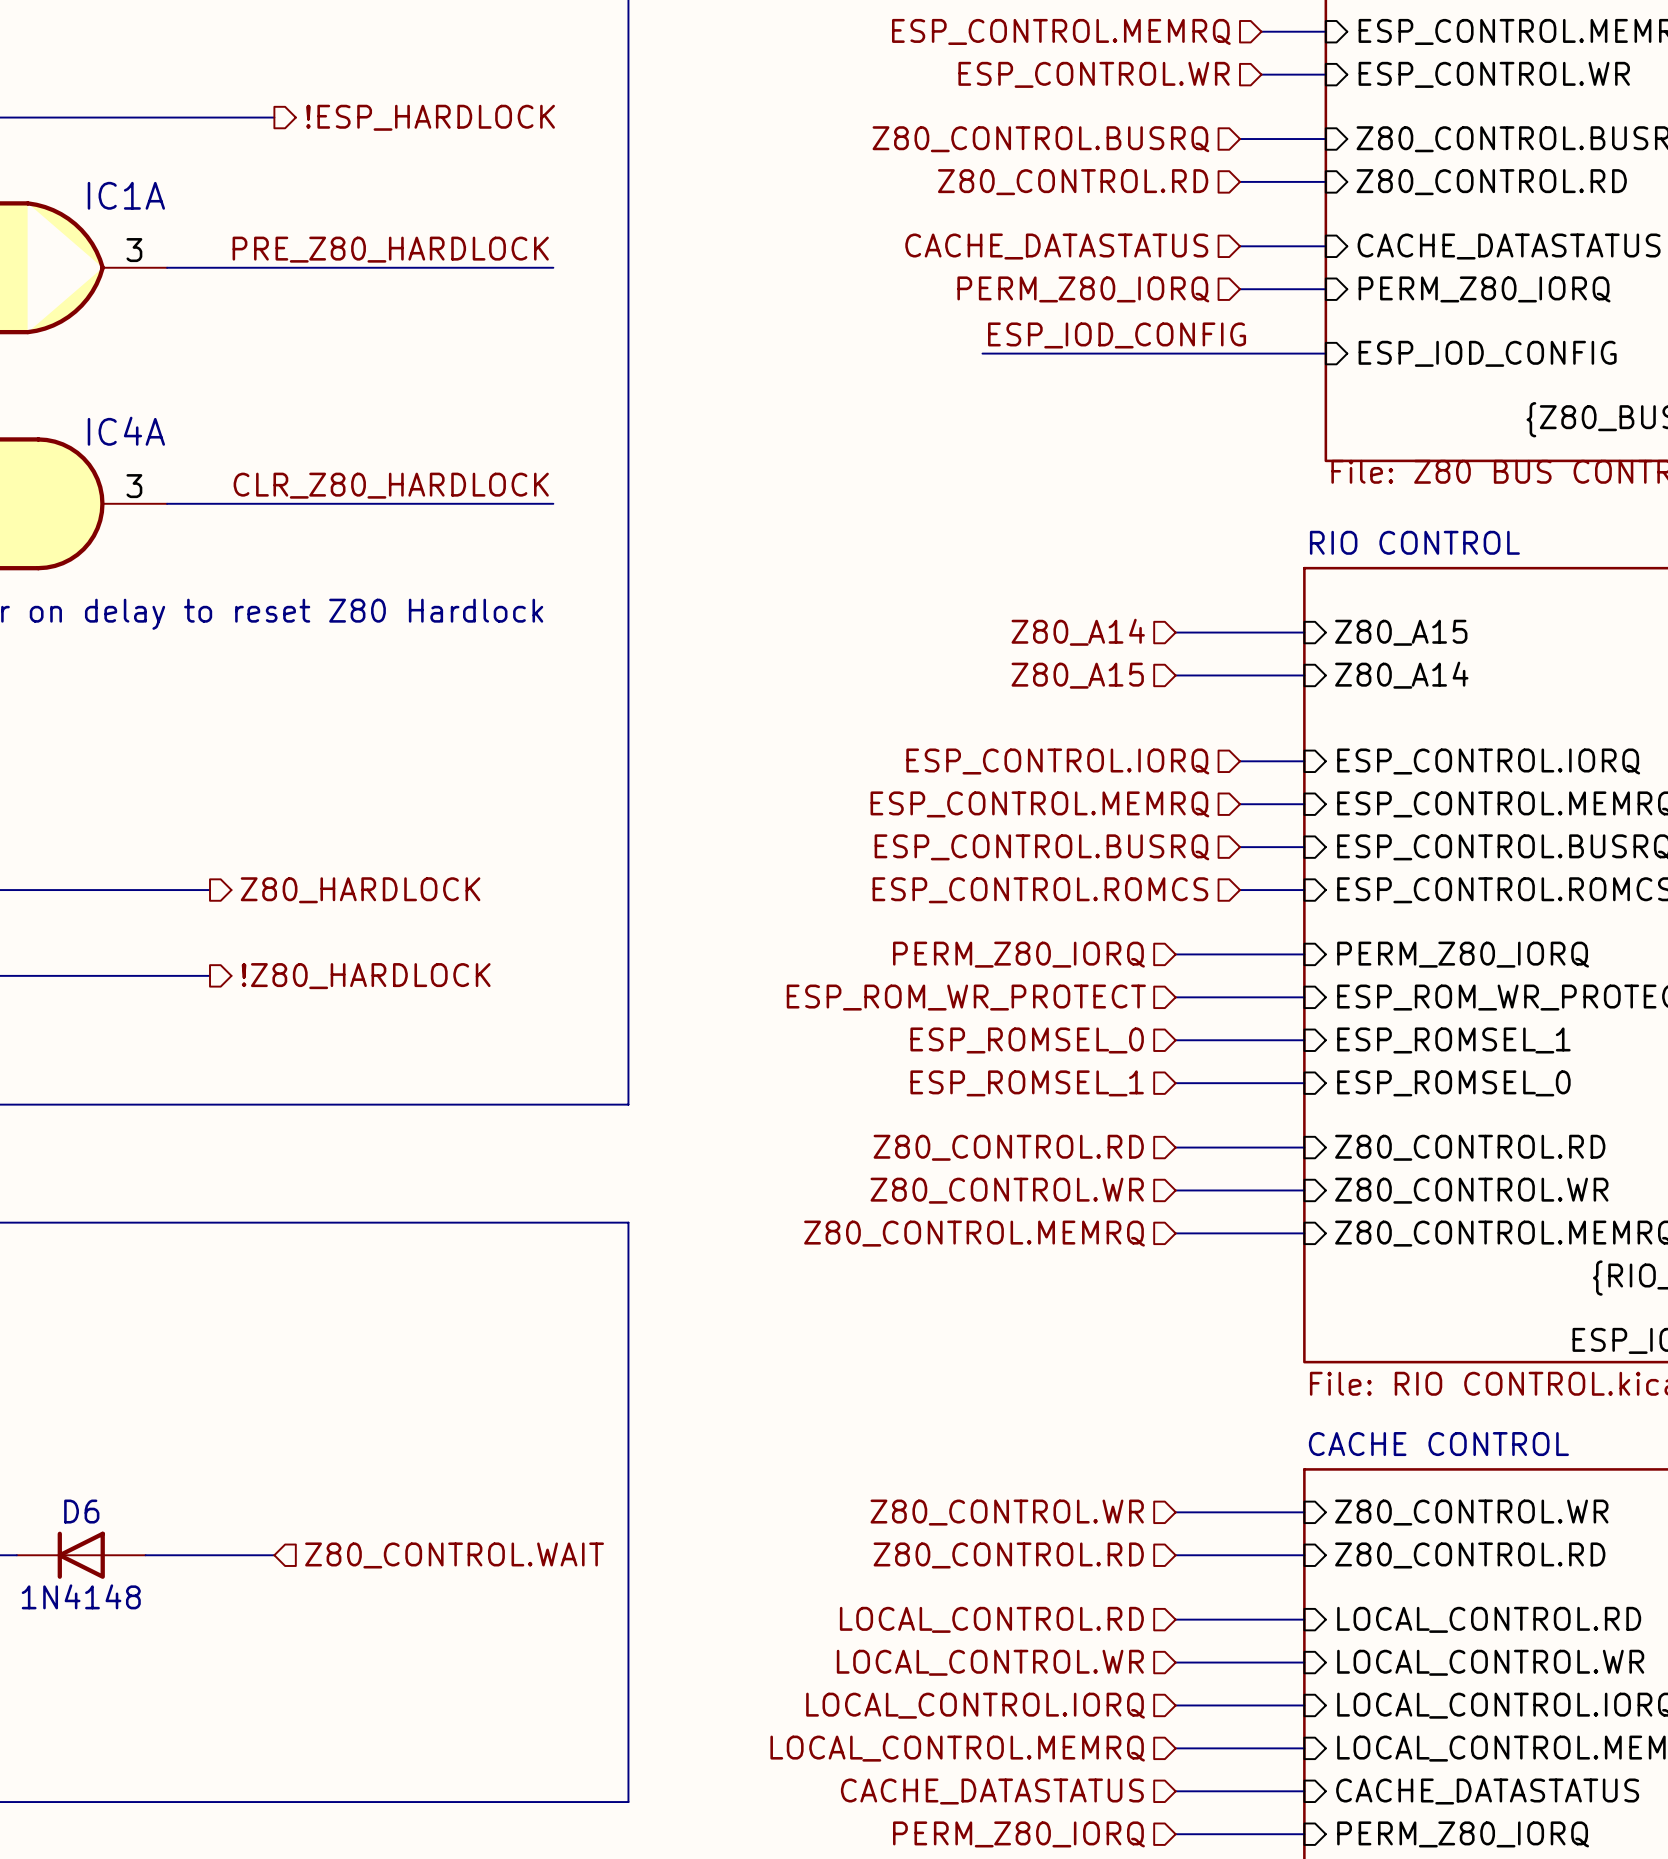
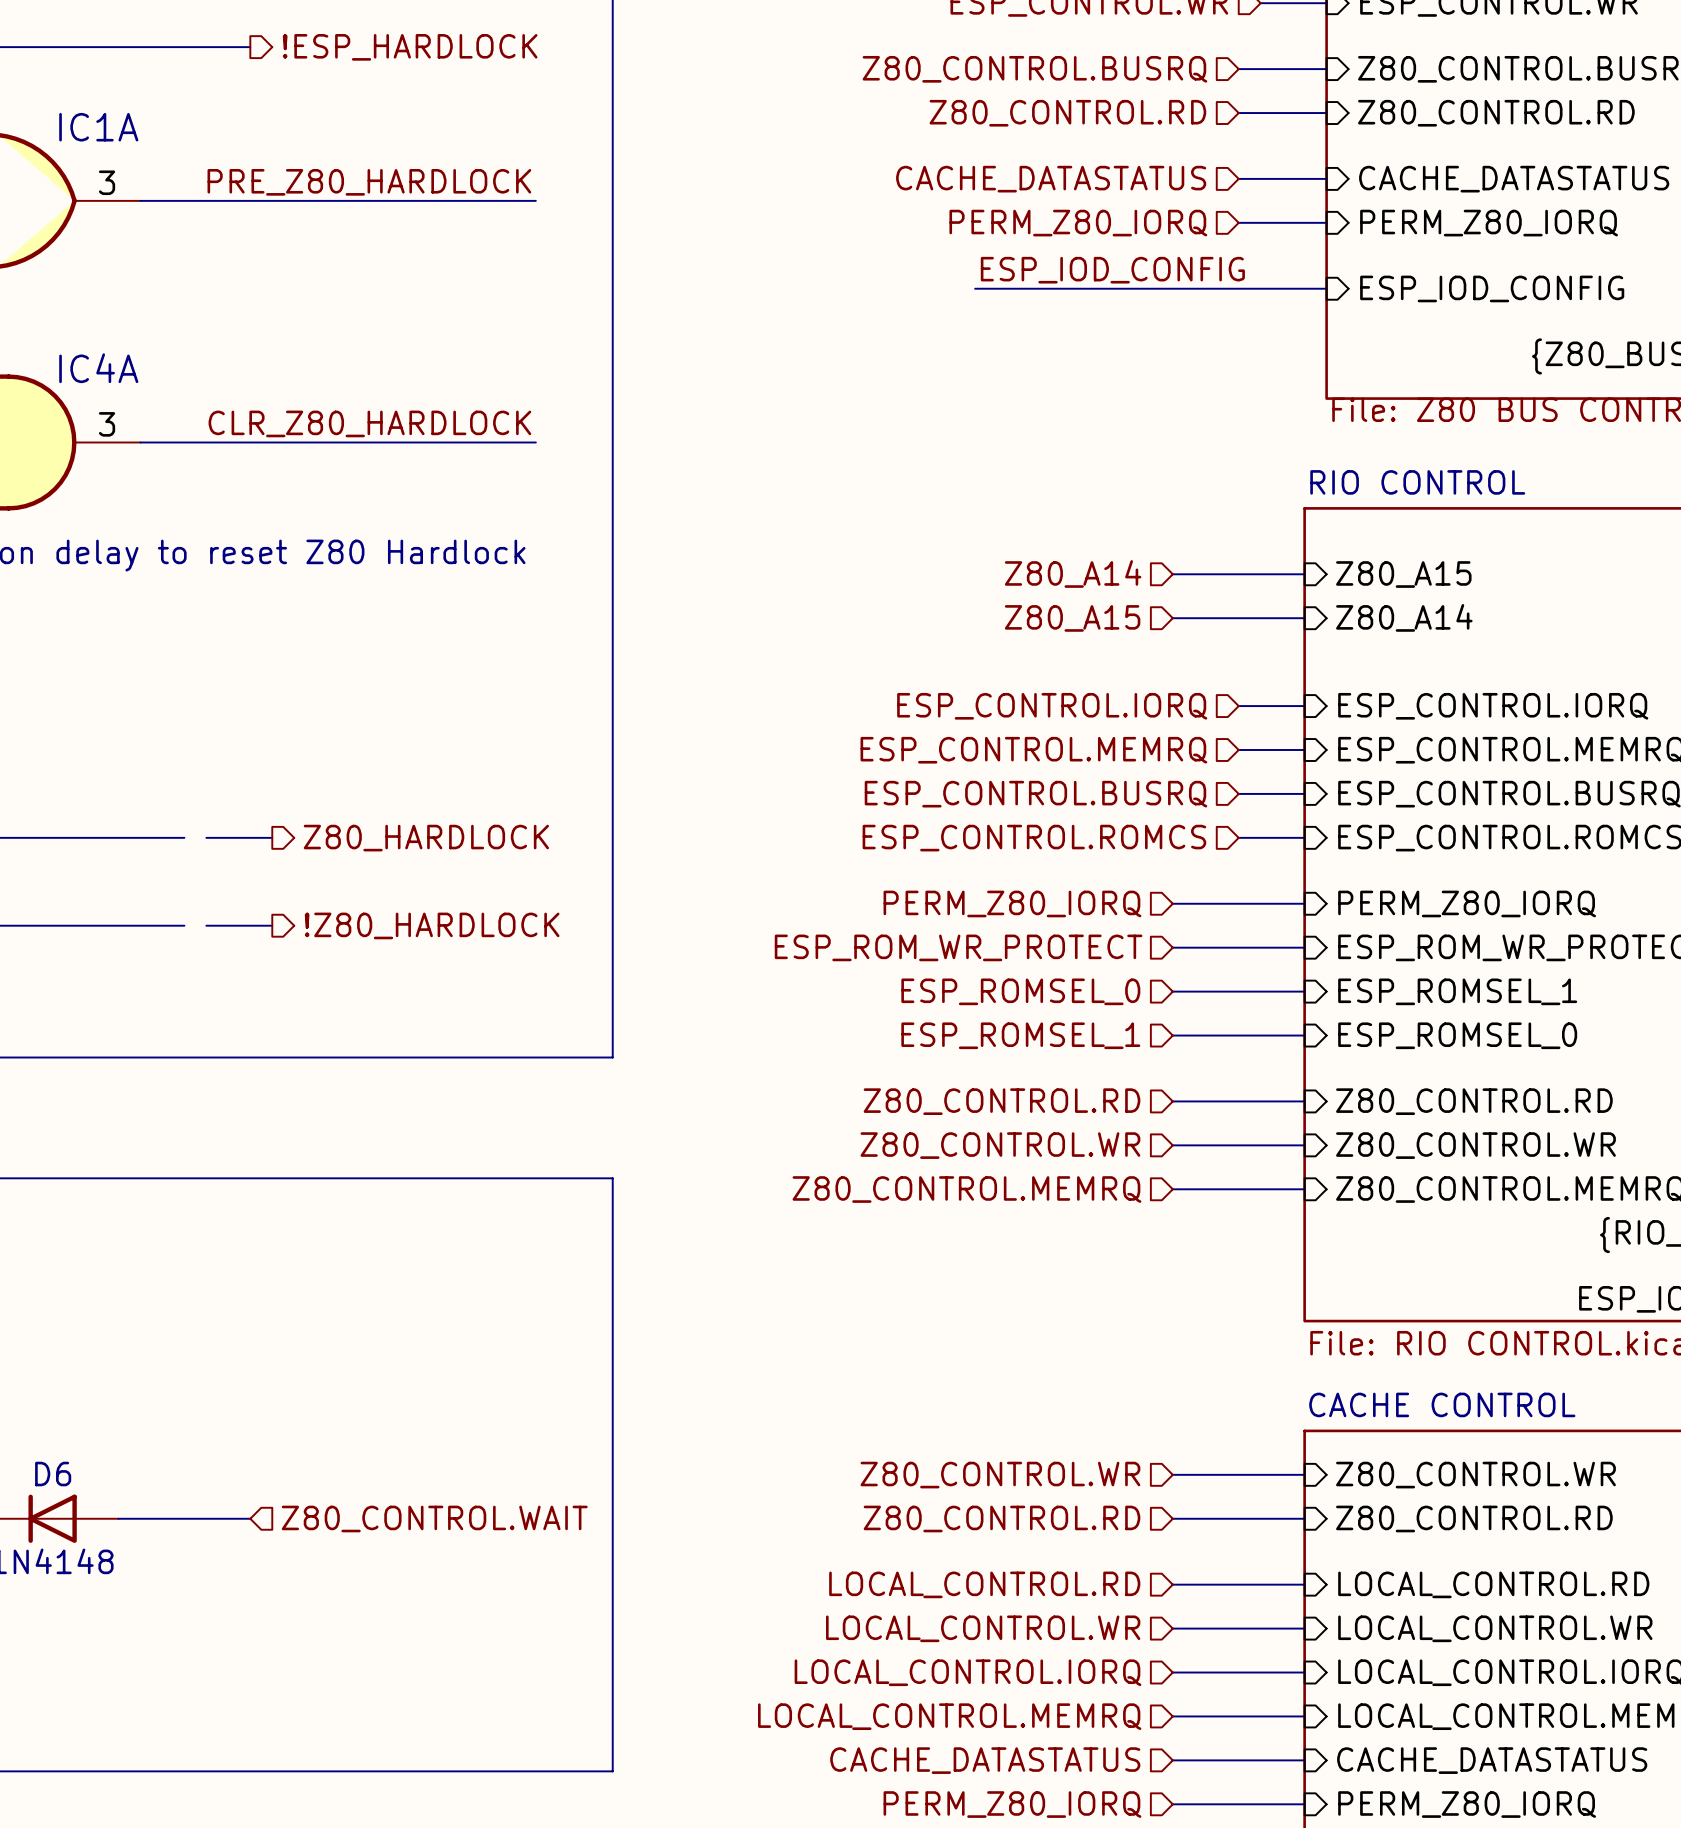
wire: none -> (206, 837) (272, 837)
hierarchical label position: Z80_HARDLOCK (360, 890) -> Z80_HARDLOCK (426, 838)
wire: none -> (206, 925) (272, 925)
hierarchical label position: !Z80_HARDLOCK (366, 976) -> !Z80_HARDLOCK (432, 925)

